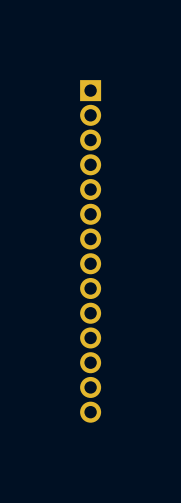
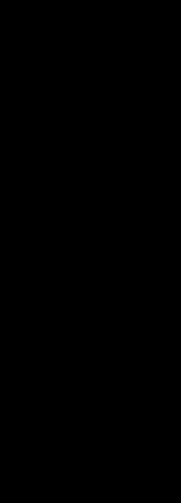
part: (90, 251) -> none

